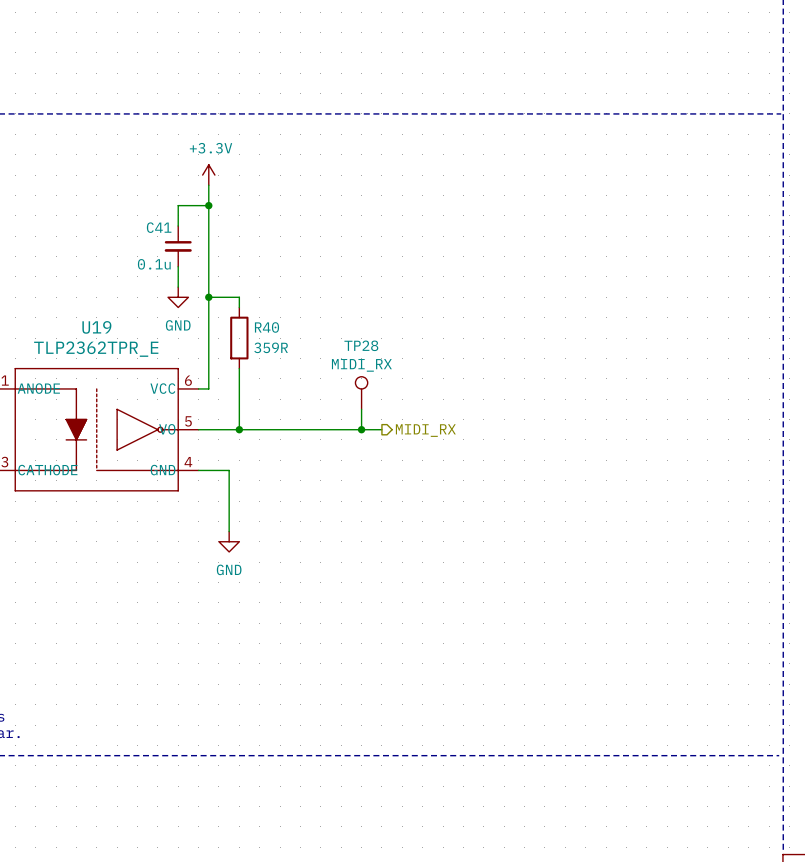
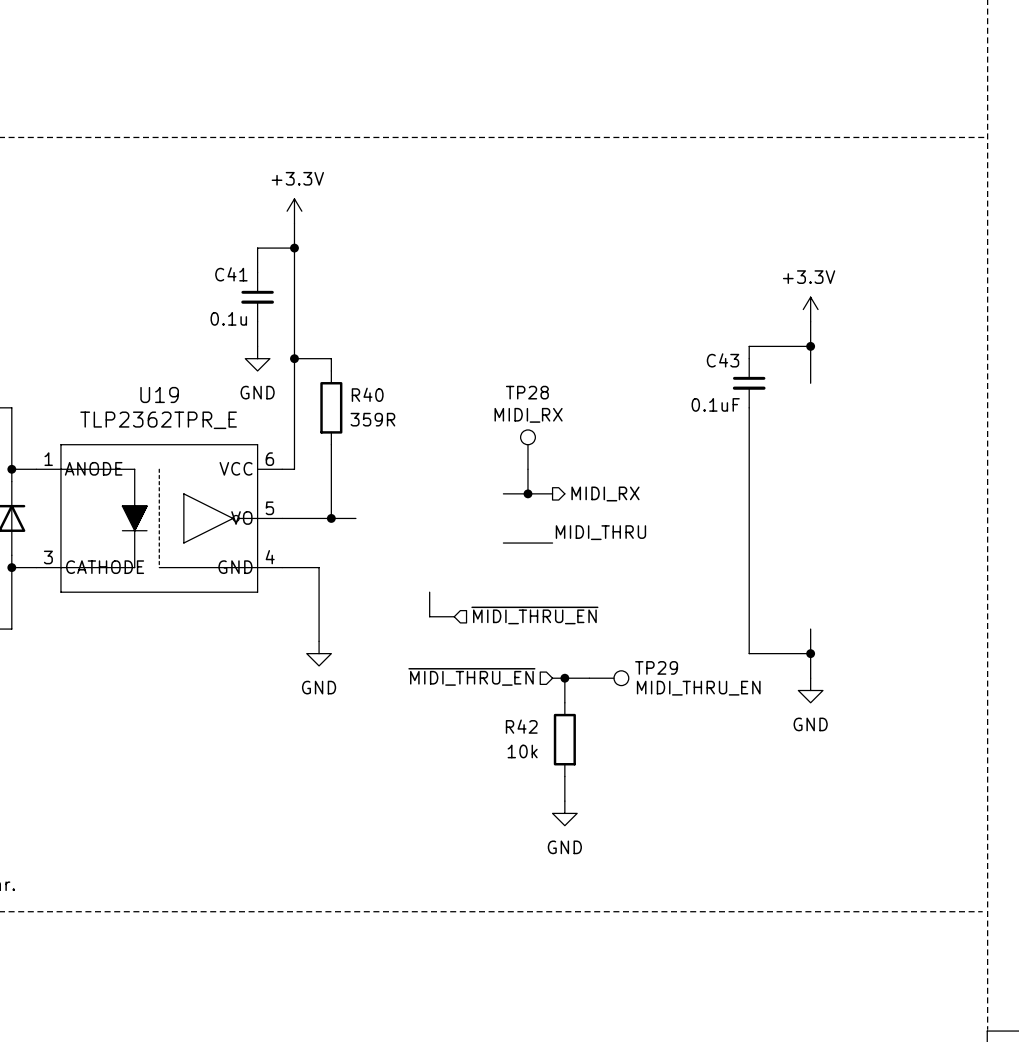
power symbol: none -> +3.3V (810, 309)
wire: none -> (810, 321) (810, 383)
wire: none -> (810, 346) (749, 346) (749, 358)
junction: none -> (810, 346)
C43: none -> 0.1uF (749, 383)
wire: none -> (749, 407) (749, 653) (810, 653)
TP28 position: (361, 393) -> (527, 449)
wire: (361, 409) (361, 429) -> (527, 469) (527, 493)
wire: none -> (503, 493) (552, 493)
wire: (259, 429) (381, 429) -> none
junction position: (361, 429) -> (527, 493)
hierarchical label position: MIDI_RX (425, 430) -> MIDI_RX (605, 493)
label: none -> MIDI_THRU (600, 532)
wire: none -> (503, 543) (552, 543)
wire: none -> (429, 592) (429, 616) (454, 616)
hierarchical label: none -> ~{MIDI_THRU_EN} (534, 615)
wire: none -> (810, 629) (810, 678)
junction: none -> (810, 653)
hierarchical label: none -> ~{MIDI_THRU_EN} (471, 676)
wire: none -> (552, 678) (589, 678)
wire: none -> (564, 678) (564, 702)
junction: none -> (564, 678)
TP29: none -> MIDI_THRU_EN (609, 678)
power symbol: none -> GND (810, 690)
R42: none -> 10k (564, 739)
wire: none -> (564, 776) (564, 801)
power symbol: none -> GND (564, 813)

